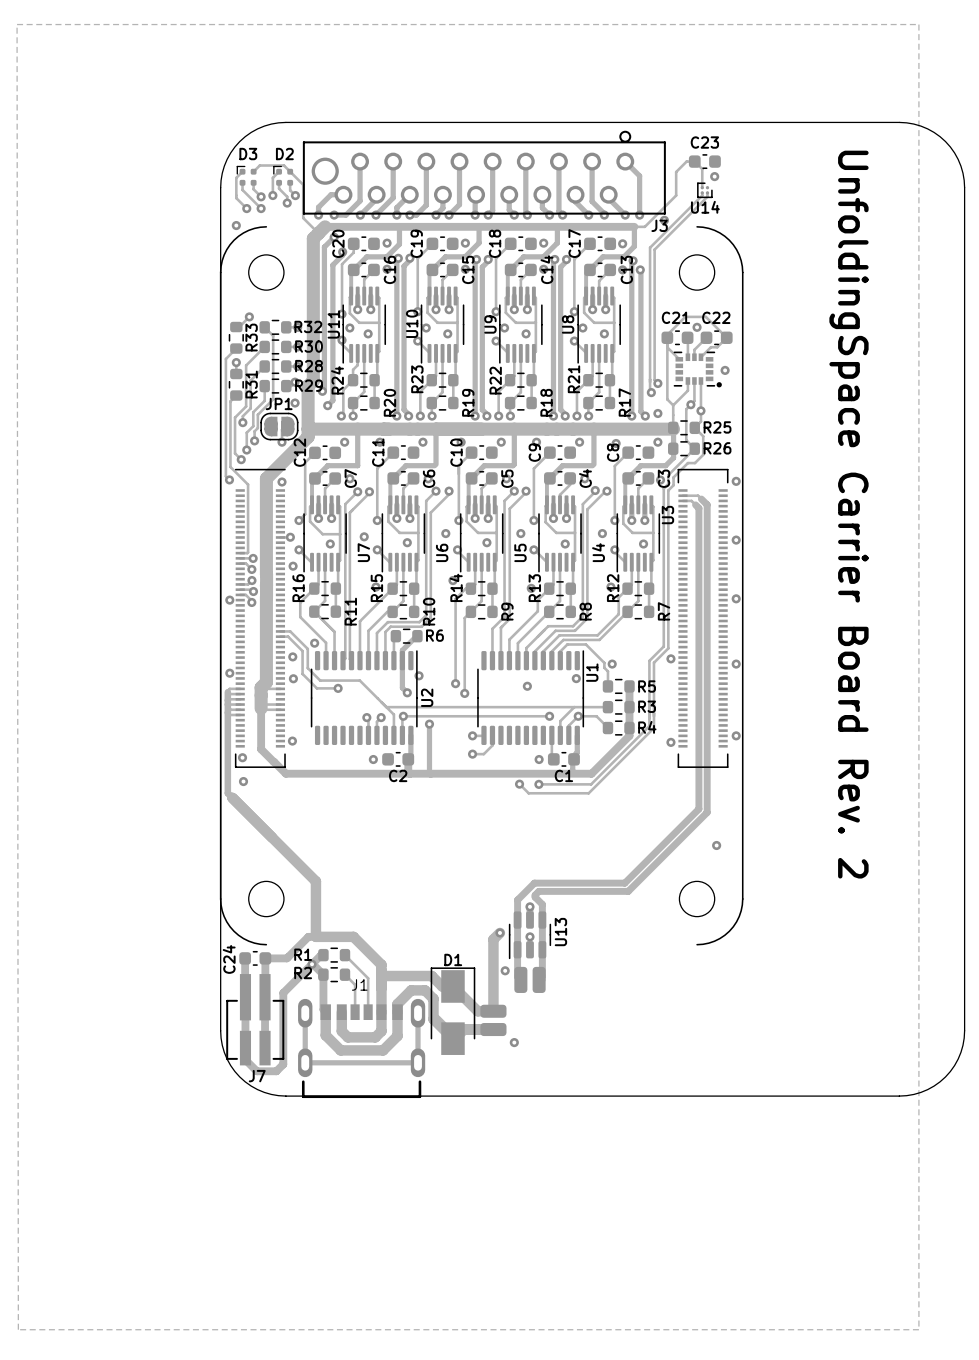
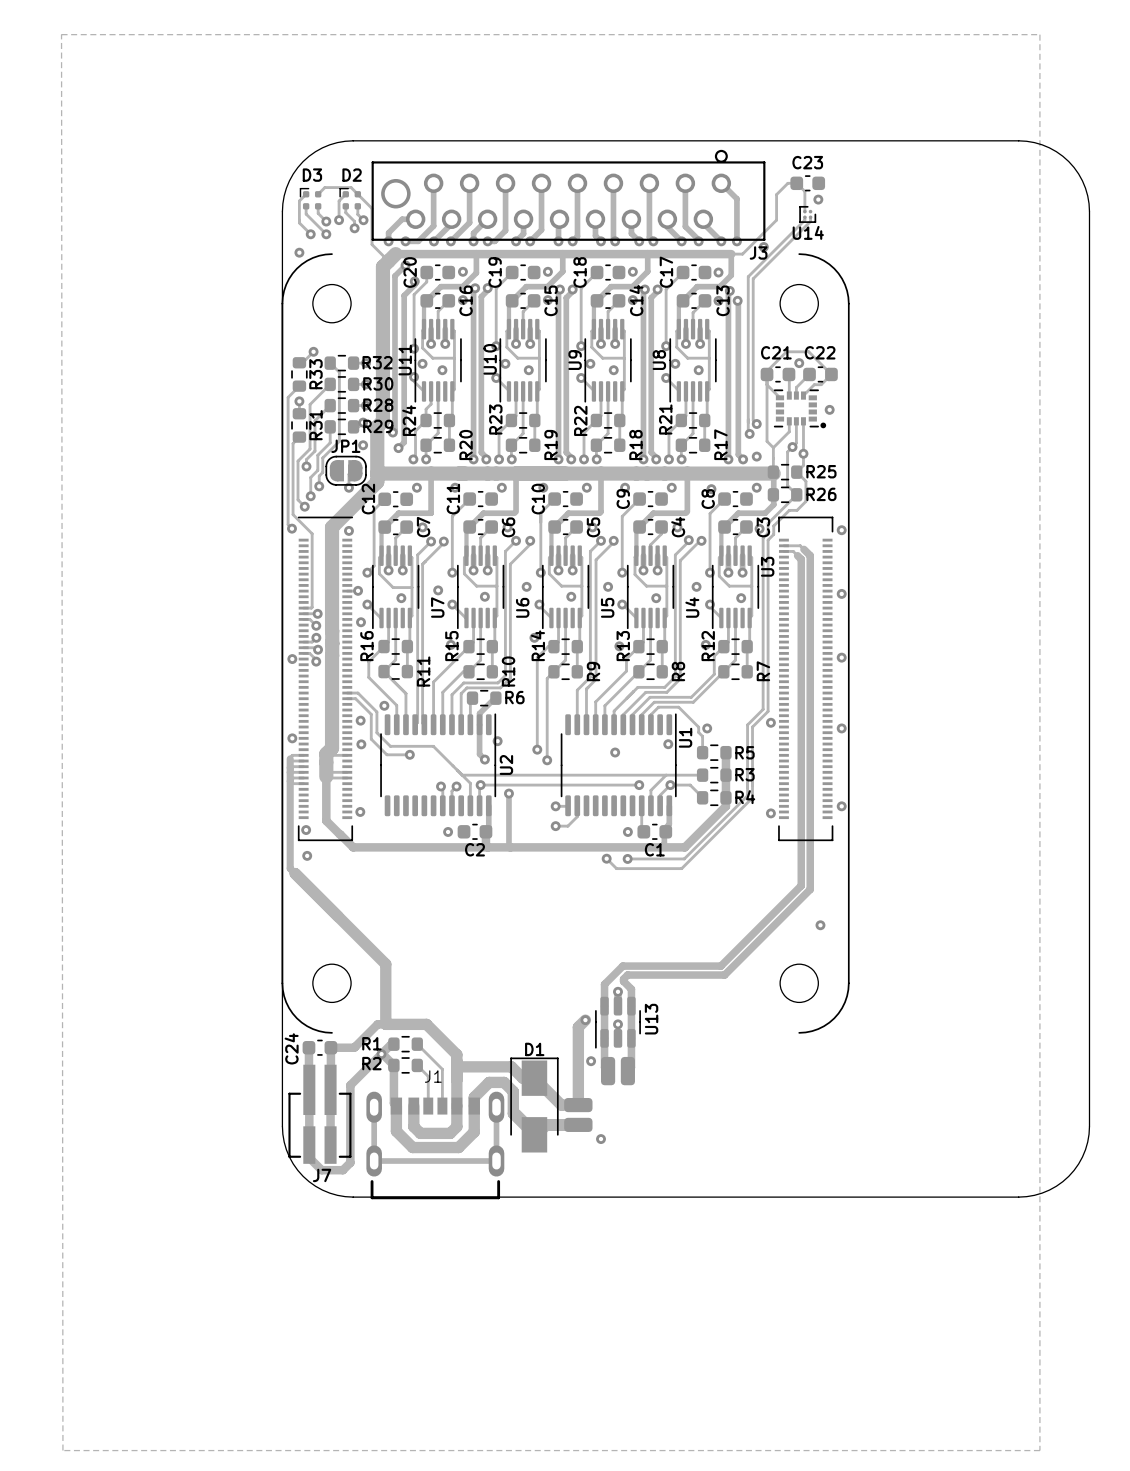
text: UnfoldingSpace Carrier Board Rev. 2 (848, 514) -> none

